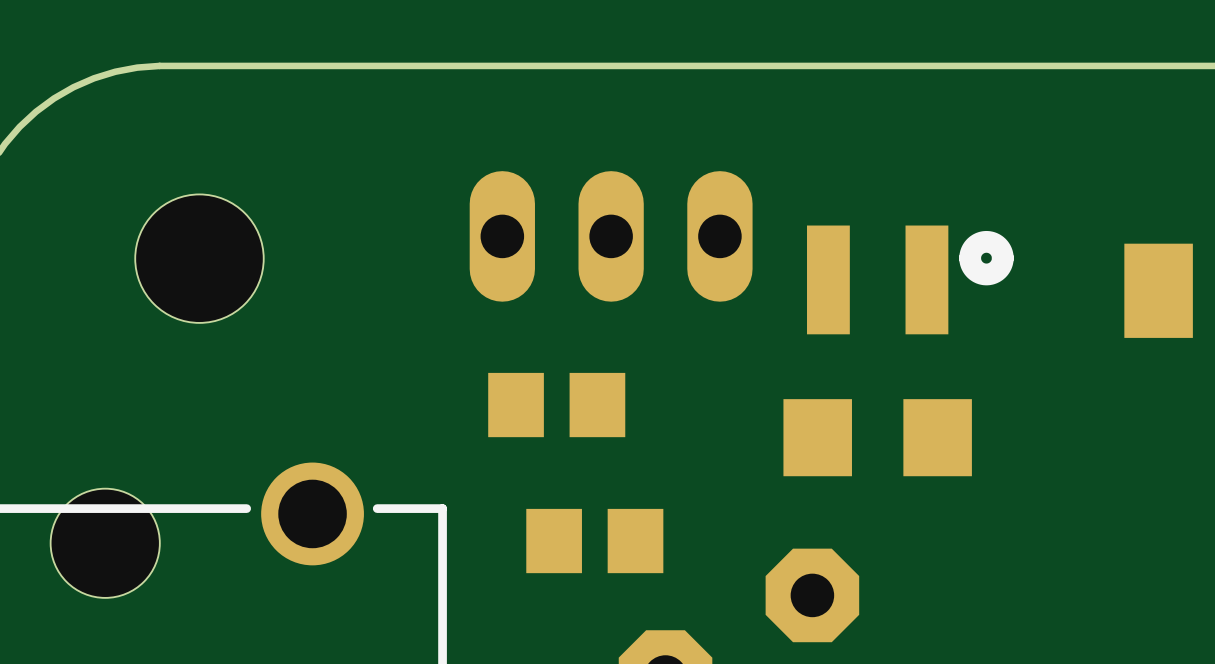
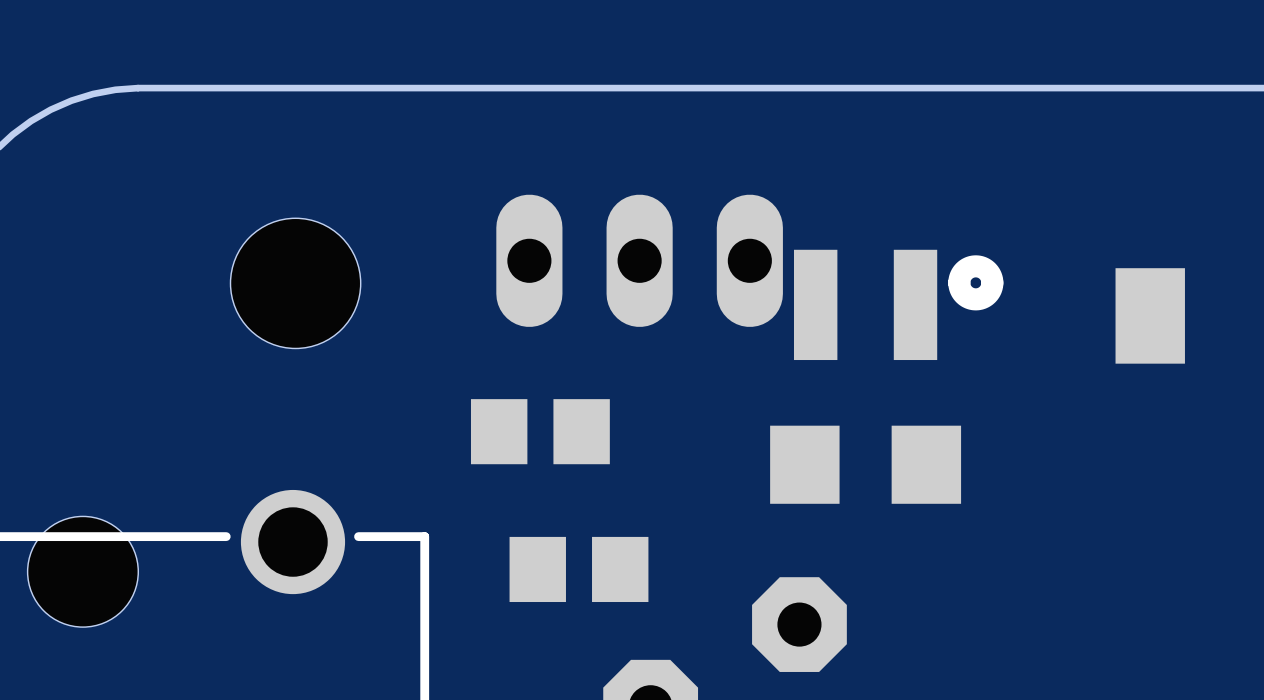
part position: (611, 236) -> (639, 260)
part position: (199, 258) -> (295, 283)

